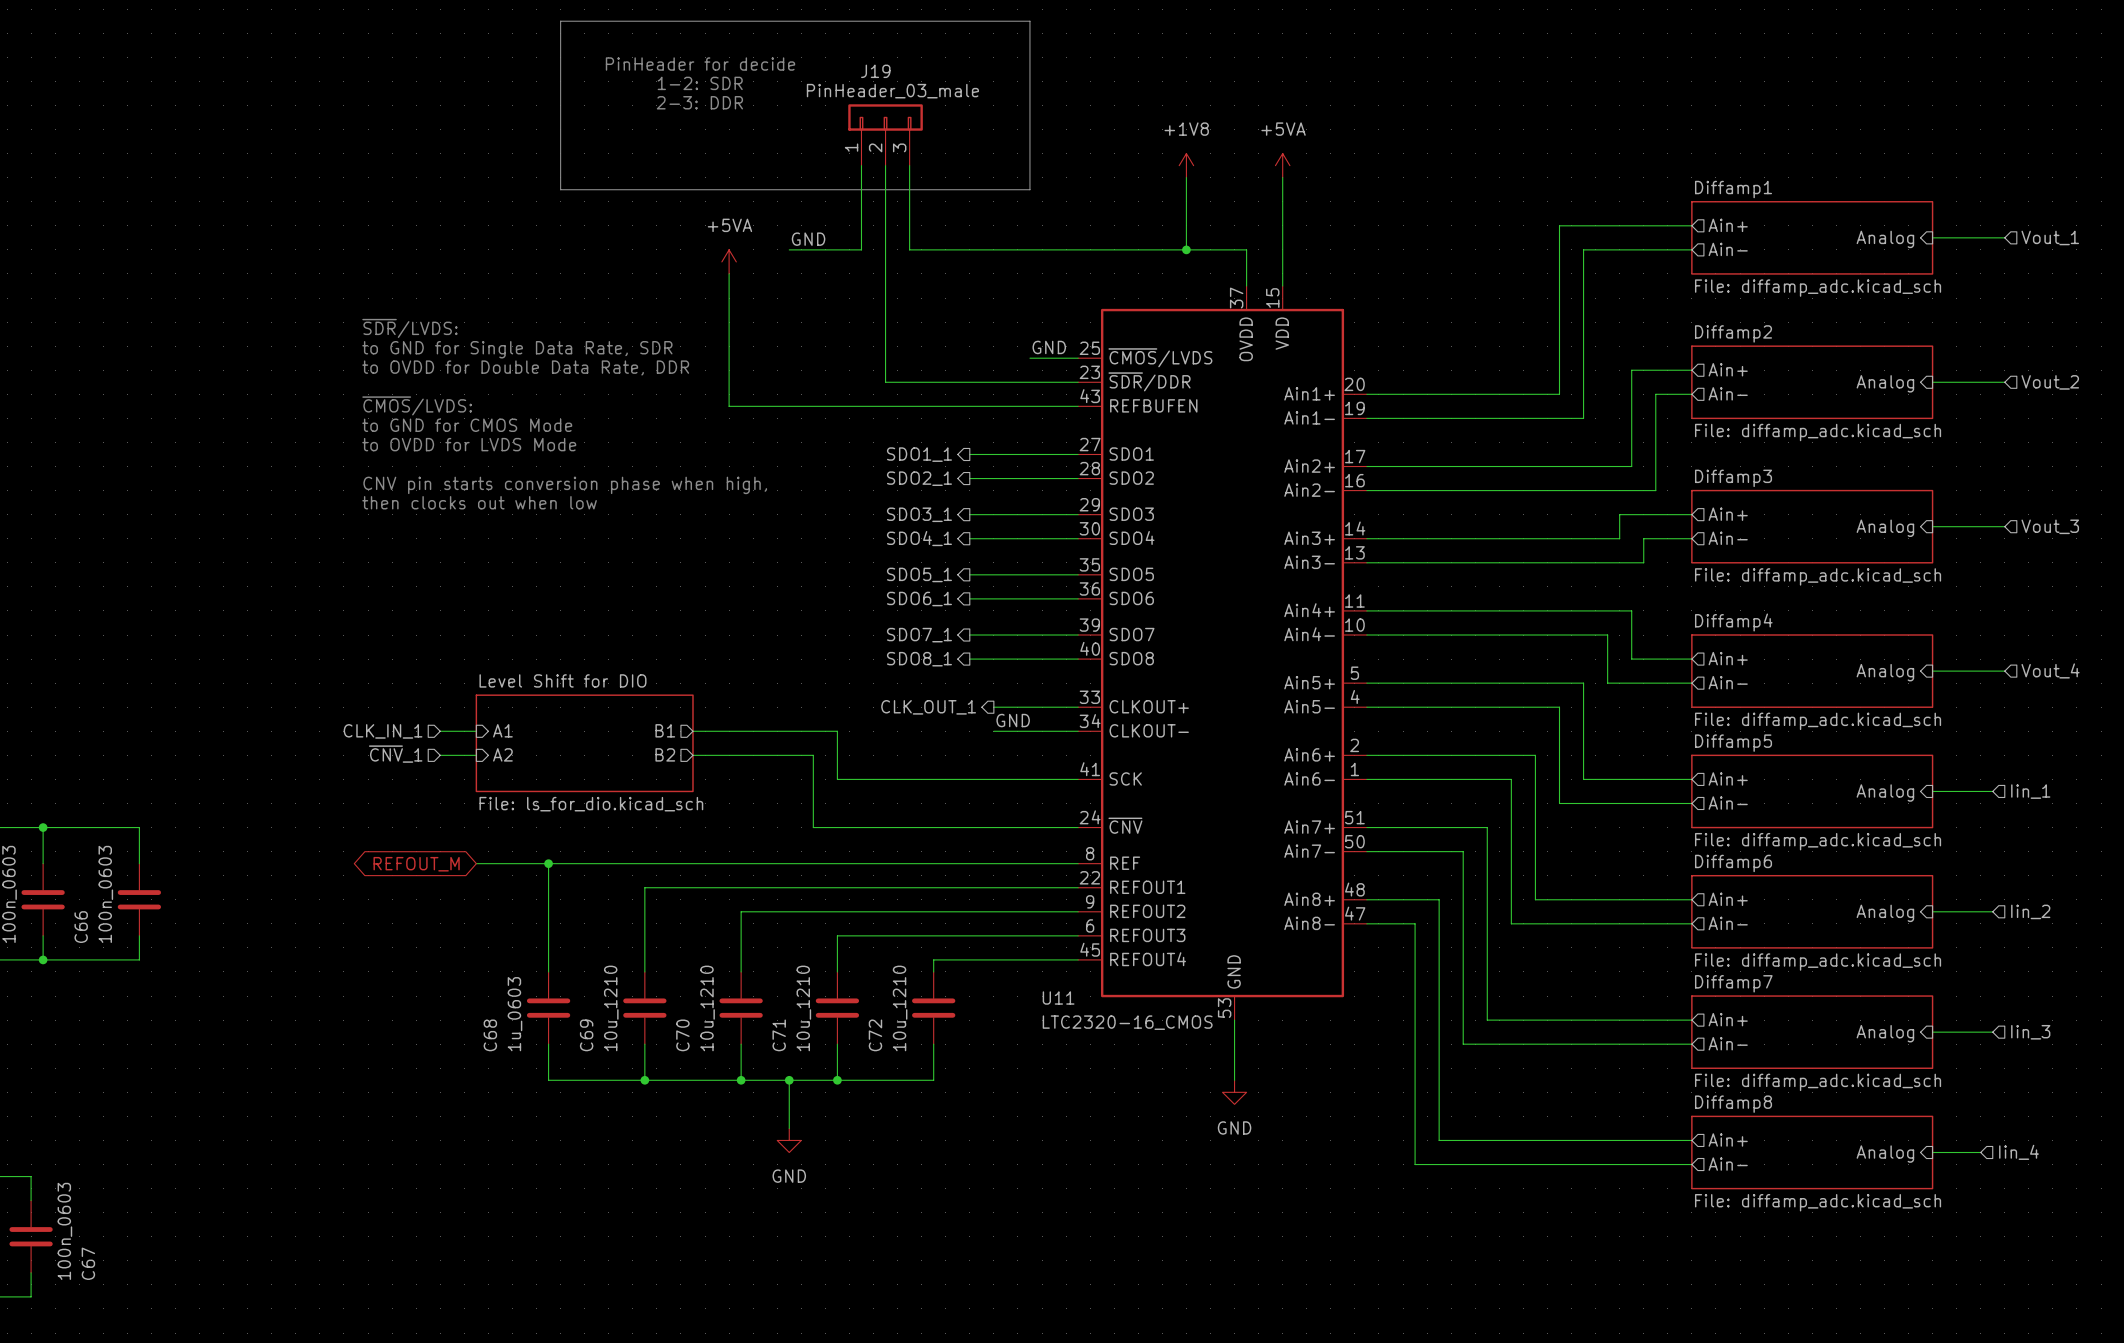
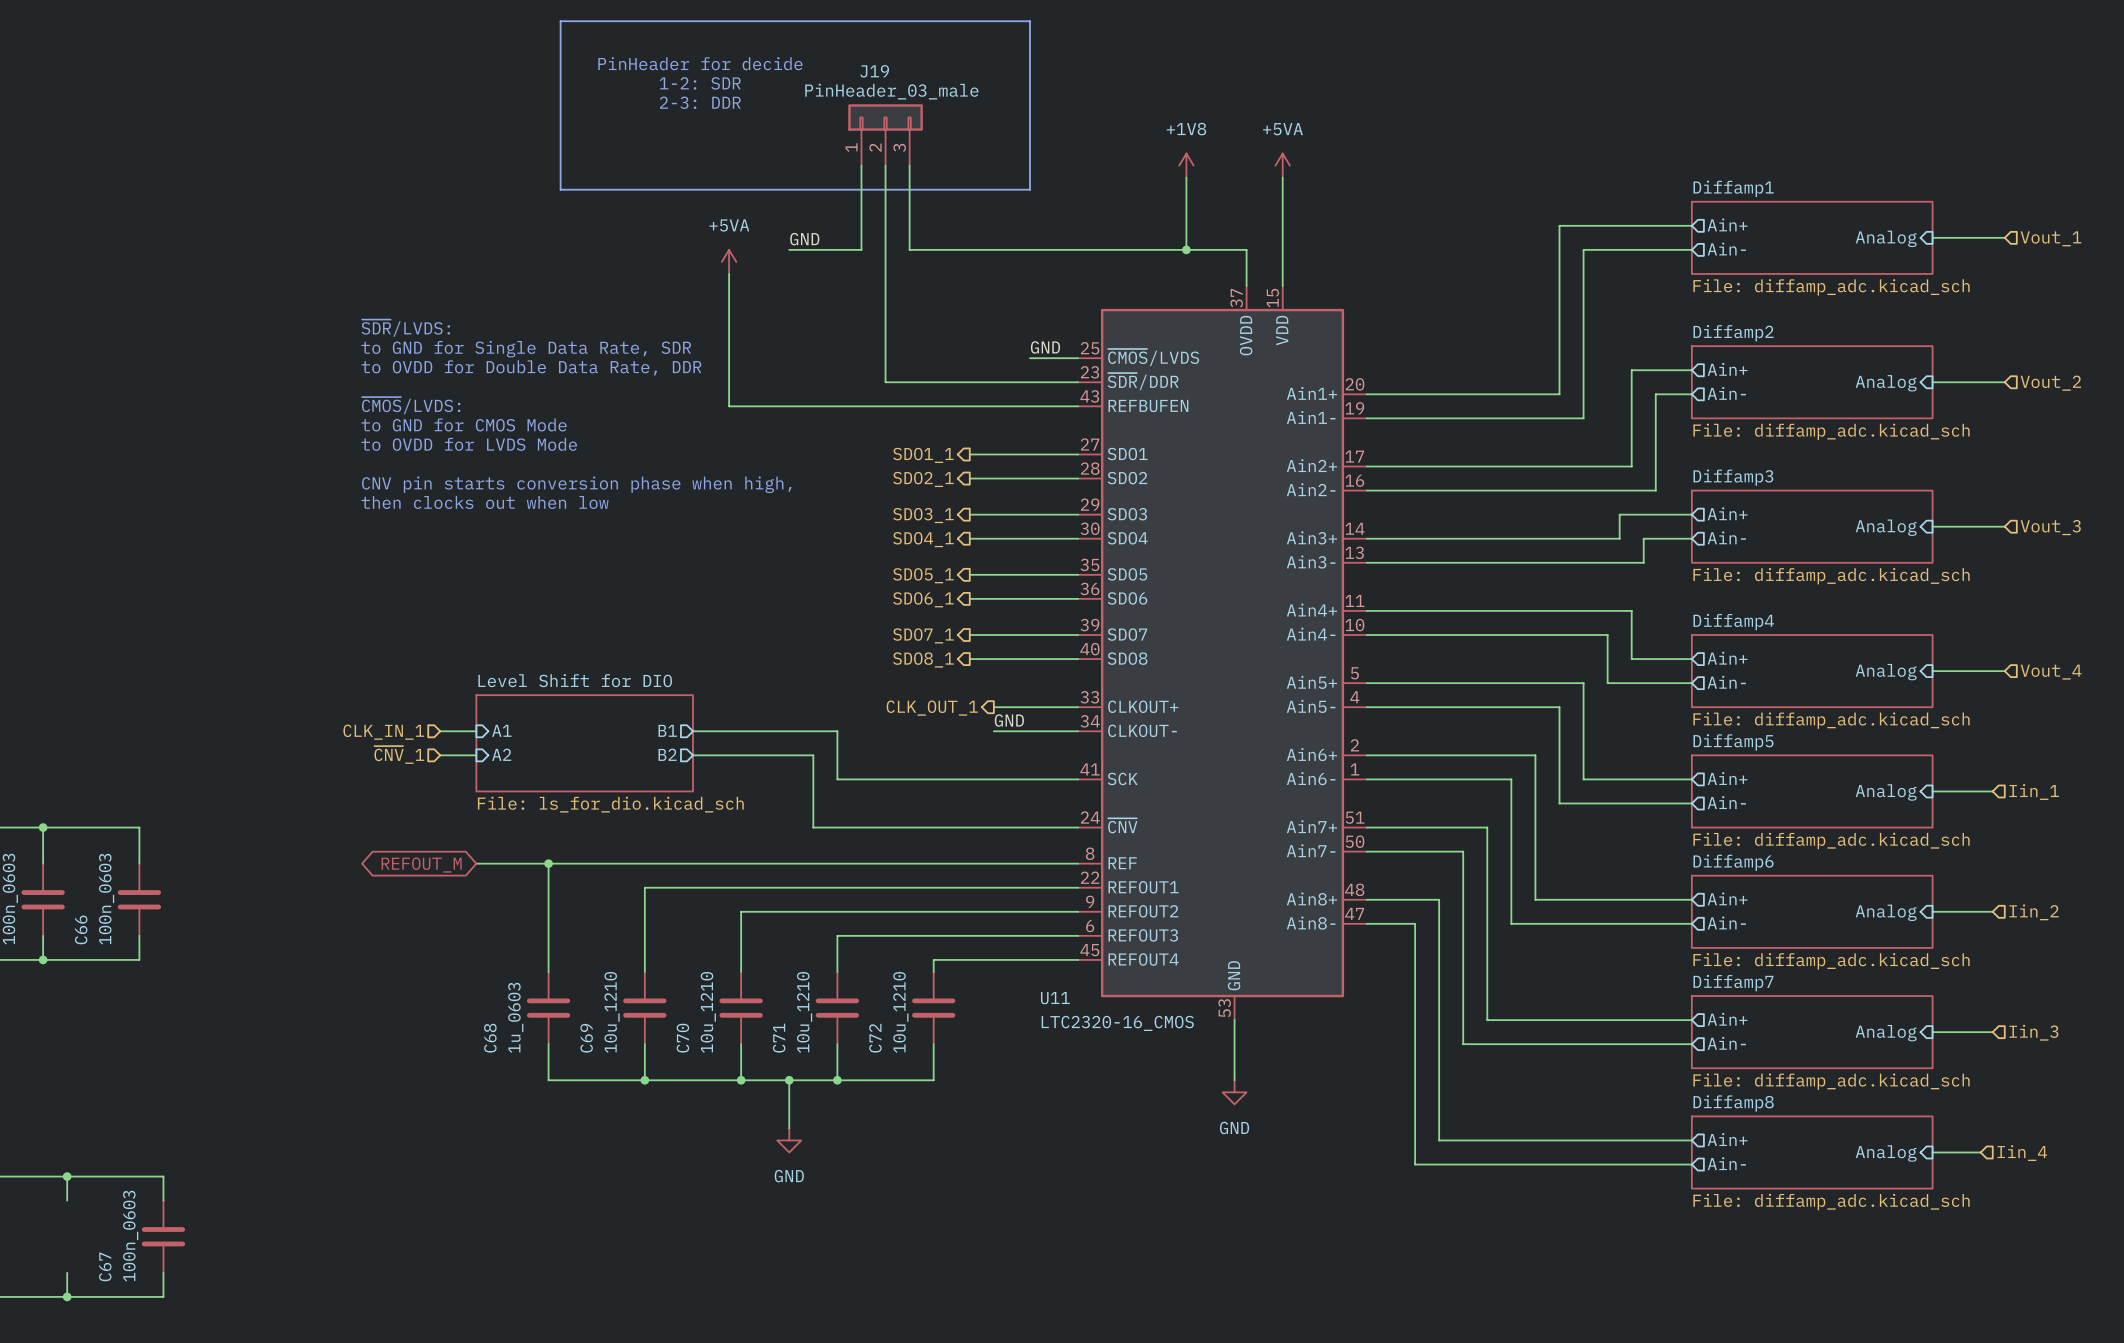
wire: (31, 1176) (31, 1200) -> (31, 1176) (163, 1176) (163, 1200)
wire: none -> (67, 1176) (67, 1200)
junction: none -> (67, 1176)
C67 value position: 100n_0603 (64, 1231) -> 100n_0603 (130, 1236)
C67 position: (31, 1236) -> (163, 1236)
C67 name position: C67 (88, 1263) -> C67 (105, 1266)
wire: (31, 1272) (31, 1296) -> (163, 1272) (163, 1296) (31, 1296)
wire: none -> (67, 1272) (67, 1296)
junction: none -> (67, 1296)

